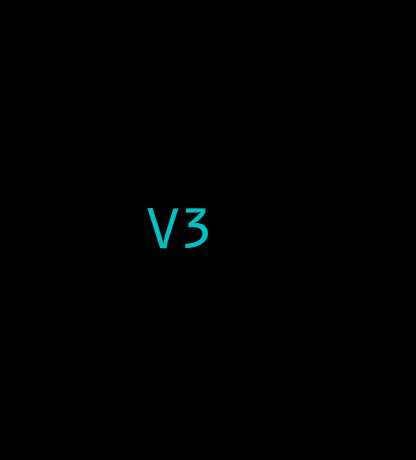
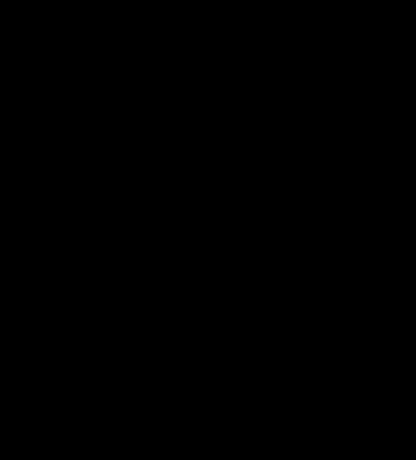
text: V3 (177, 228) -> none

